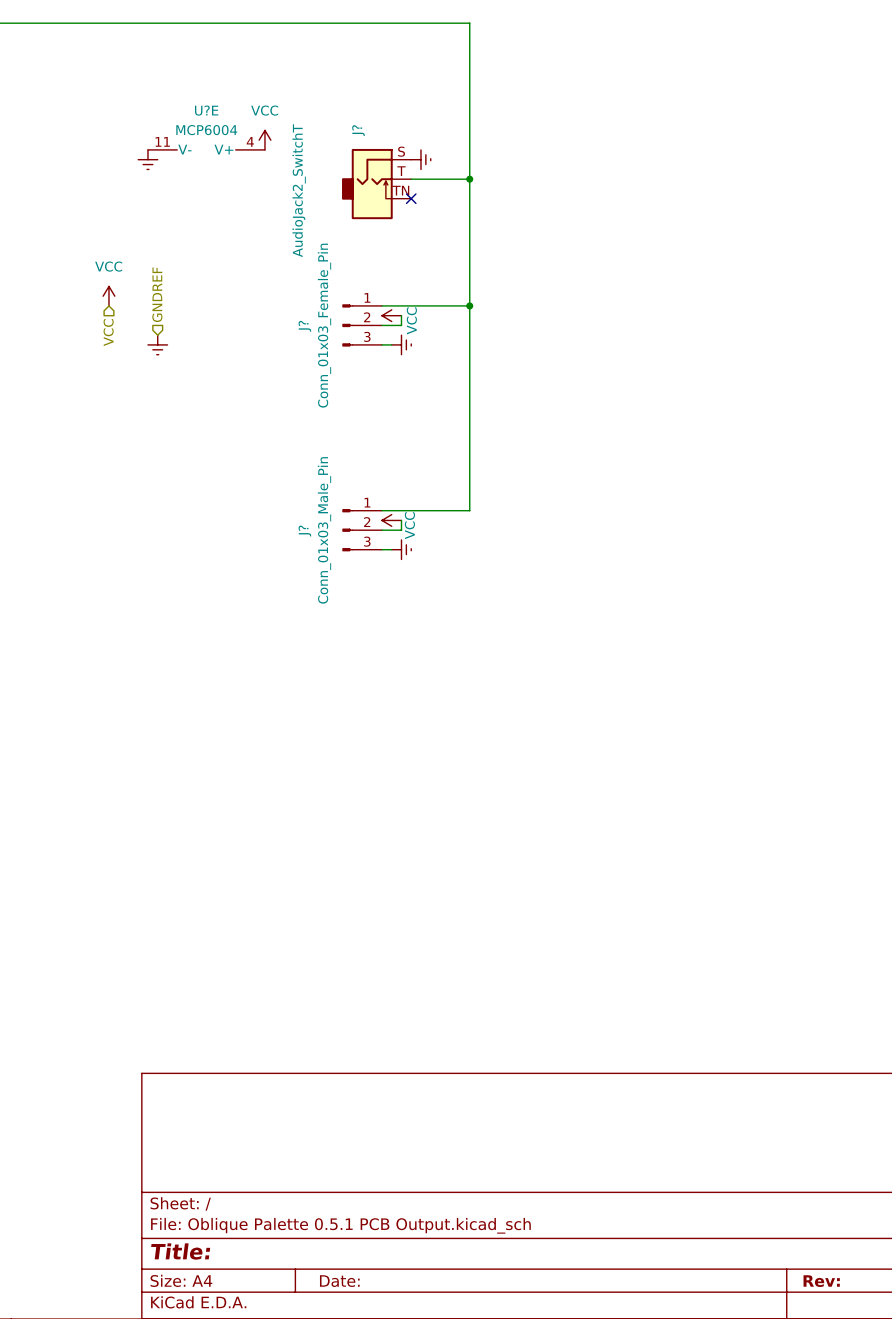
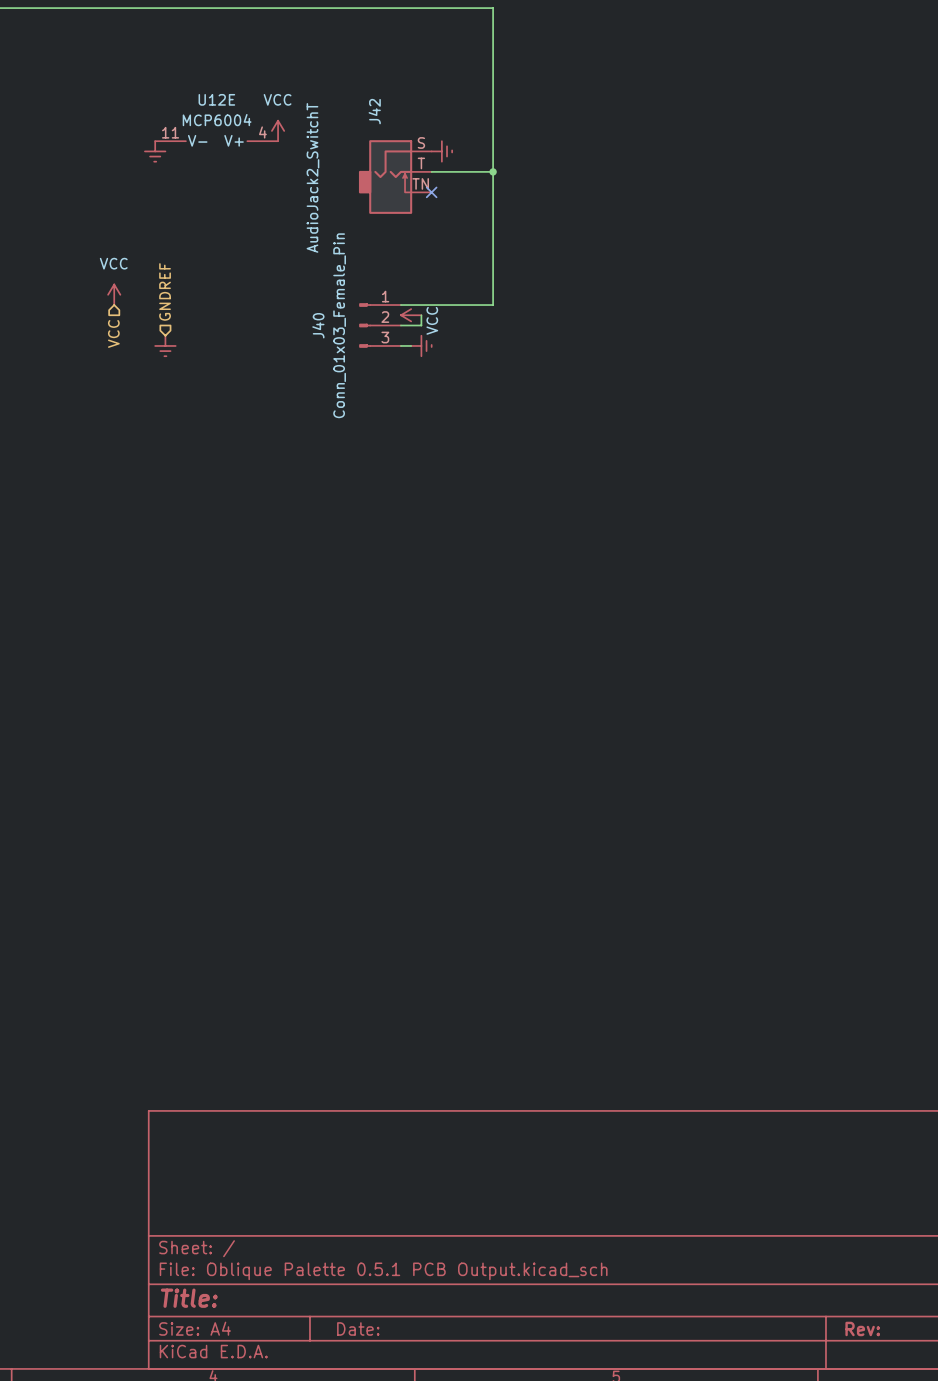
U?E name: U?E (206, 110) -> U12E (216, 99)
J? name: J? (358, 130) -> J42 (374, 111)
wire: (469, 305) (469, 510) (381, 510) -> none
junction: (469, 305) -> none
J? name: J? (304, 326) -> J40 (318, 325)
power symbol: VCC (391, 520) -> none
wire: (401, 520) (401, 530) (381, 530) -> none
J?: Conn_01x03_Male_Pin (362, 530) -> none
wire: (381, 549) (391, 549) -> none
power symbol: (401, 549) -> none

